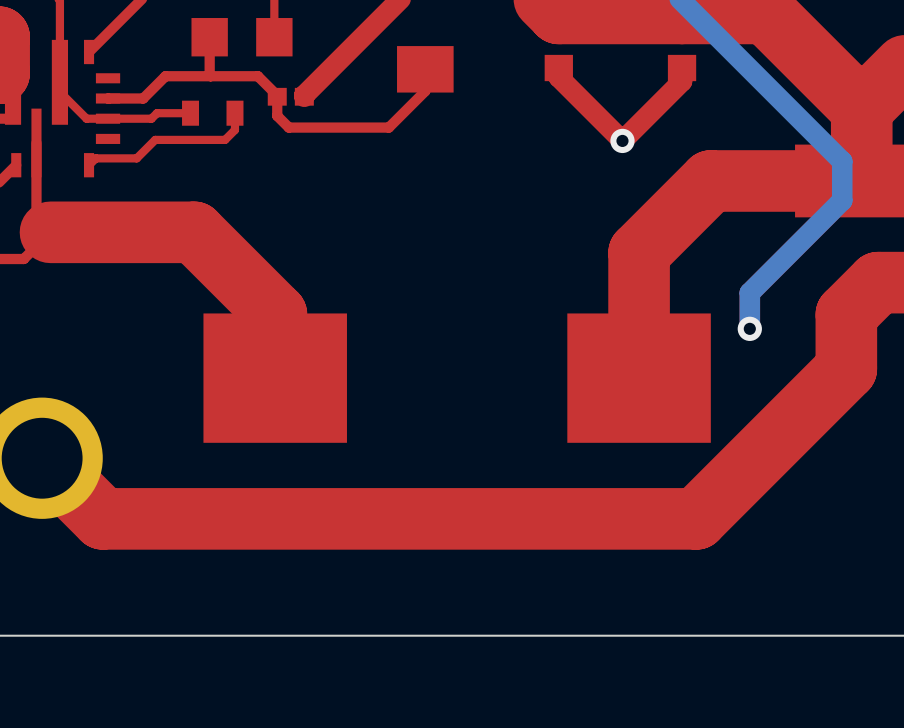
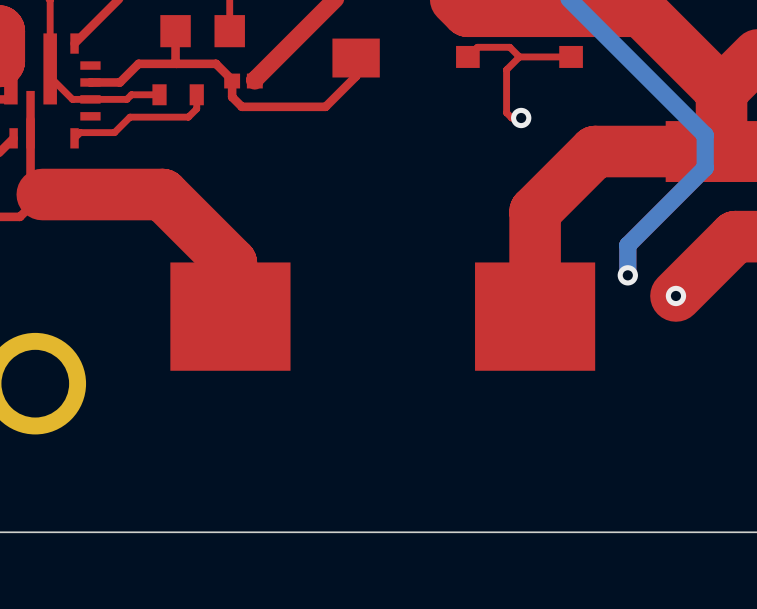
top track: none -> (519, 56) (509, 47) (477, 47) (467, 56)
top track: none -> (519, 56) (506, 69) (506, 112) (511, 117) (521, 117)
top track: (682, 68) (682, 81) (622, 140) (558, 77) (558, 68) -> (571, 56) (519, 56)
top track: (846, 314) (846, 368) (696, 518) (102, 518) (42, 458) -> (708, 263) (675, 295)
via: none -> (675, 295)

